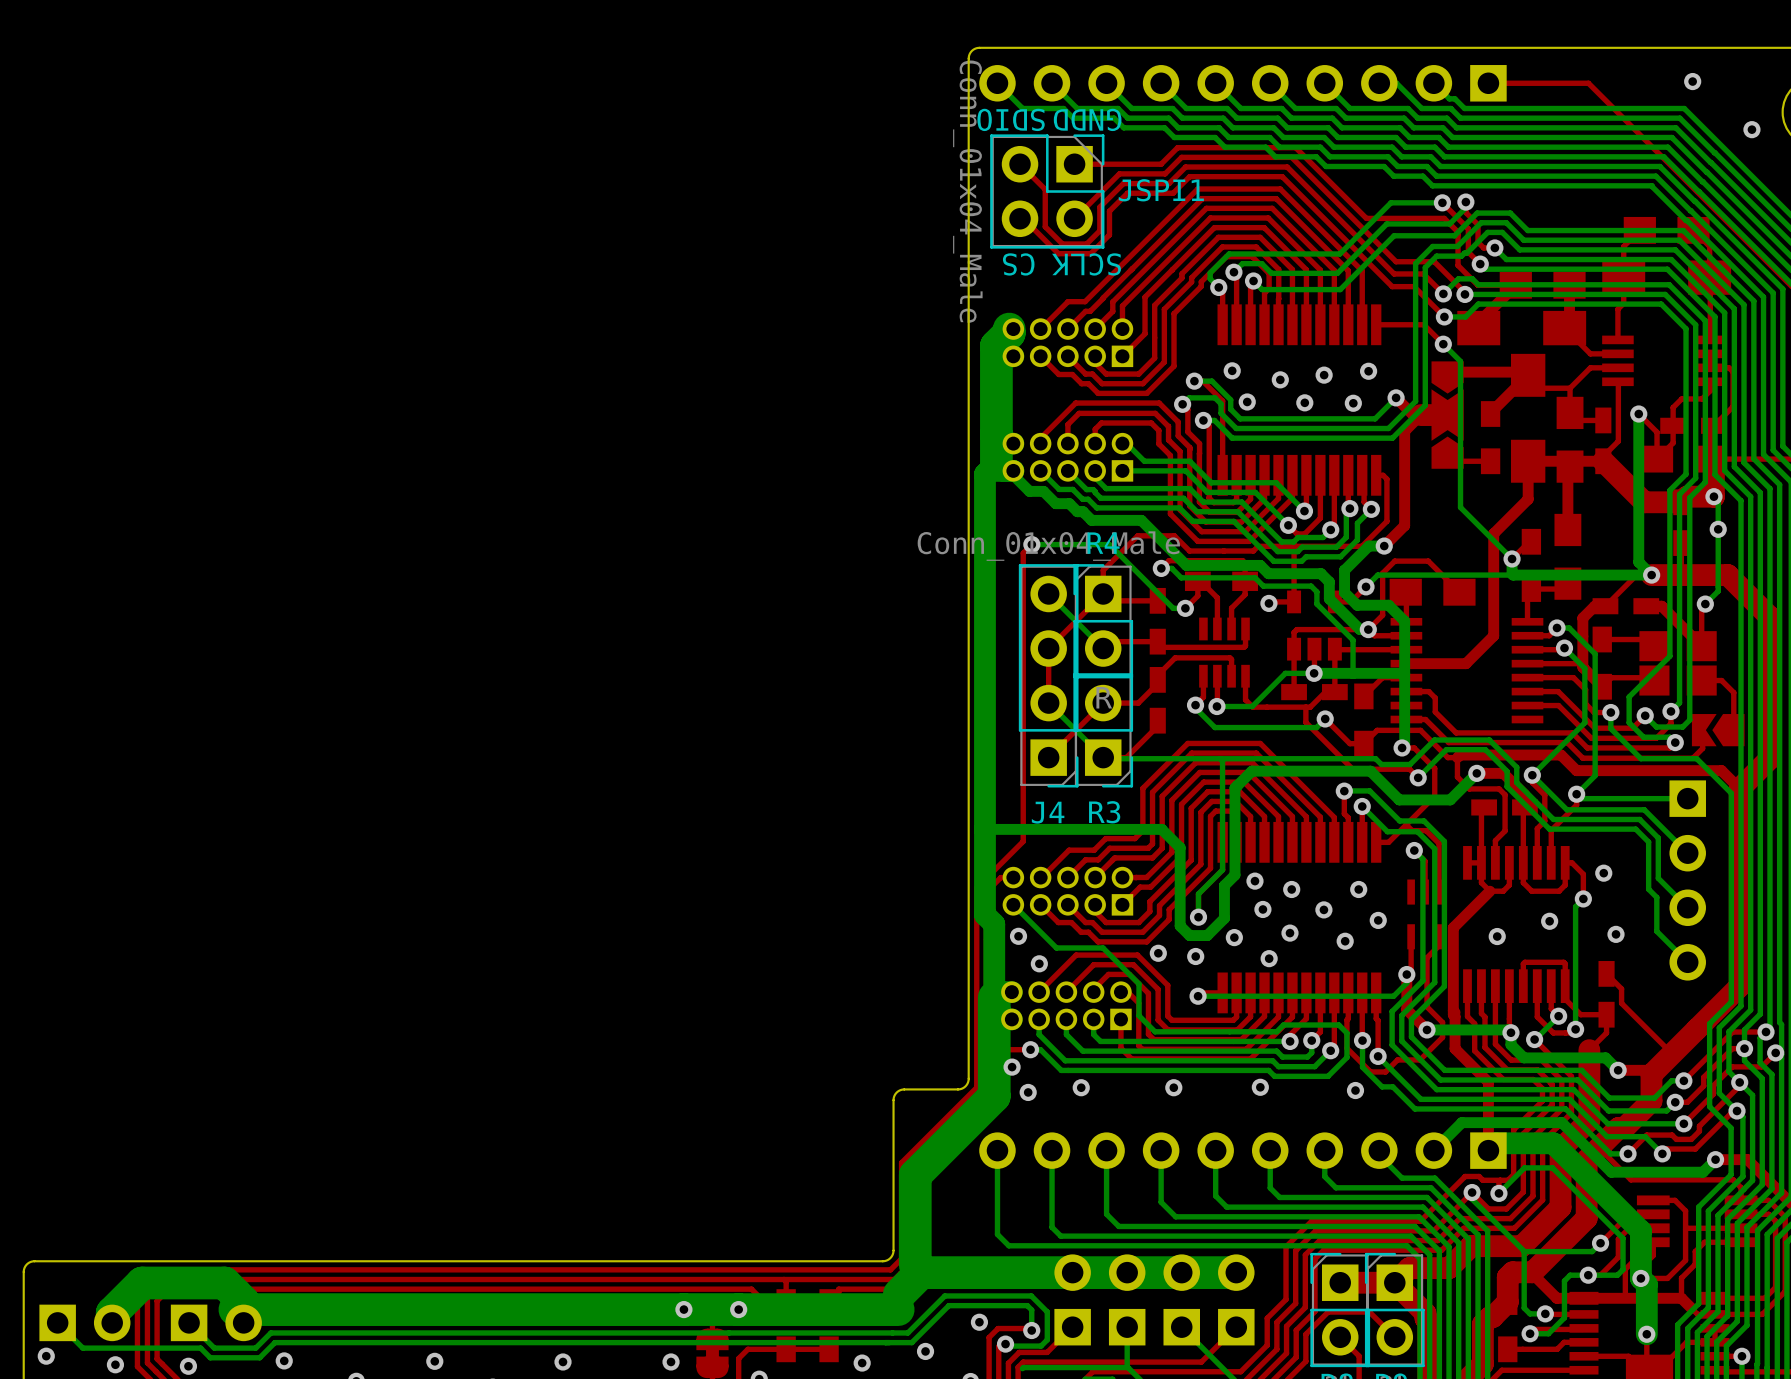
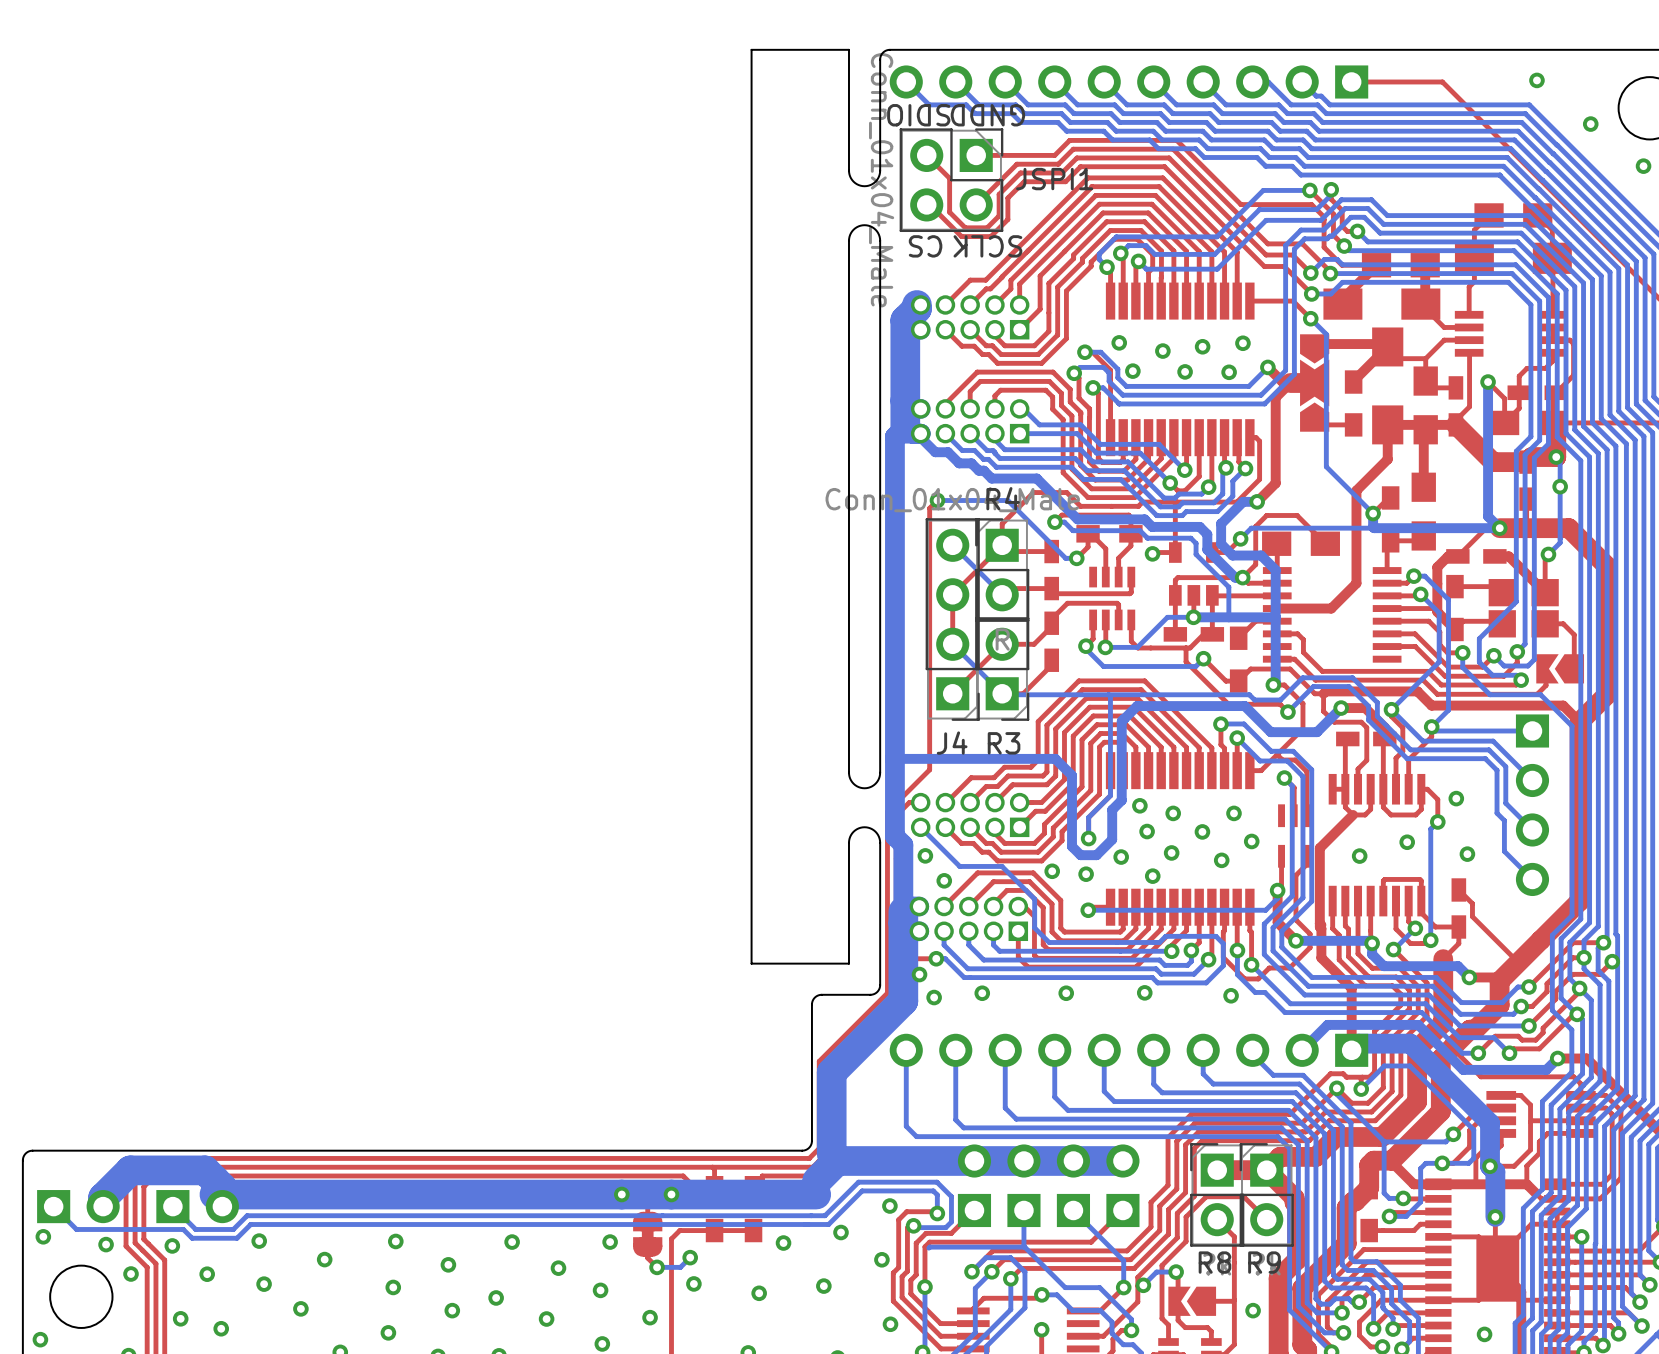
board edge: (968, 180) (968, 258) -> (880, 772) (875, 783) (864, 788) (853, 783) (848, 772) (848, 240) (853, 229) (864, 225) (875, 229) (880, 240)
board edge: (968, 844) (968, 921) -> (880, 170) (875, 181) (866, 186) (856, 184) (849, 174) (848, 49) (751, 49) (751, 963) (848, 963) (849, 838) (856, 829) (866, 827) (875, 831) (880, 842)

